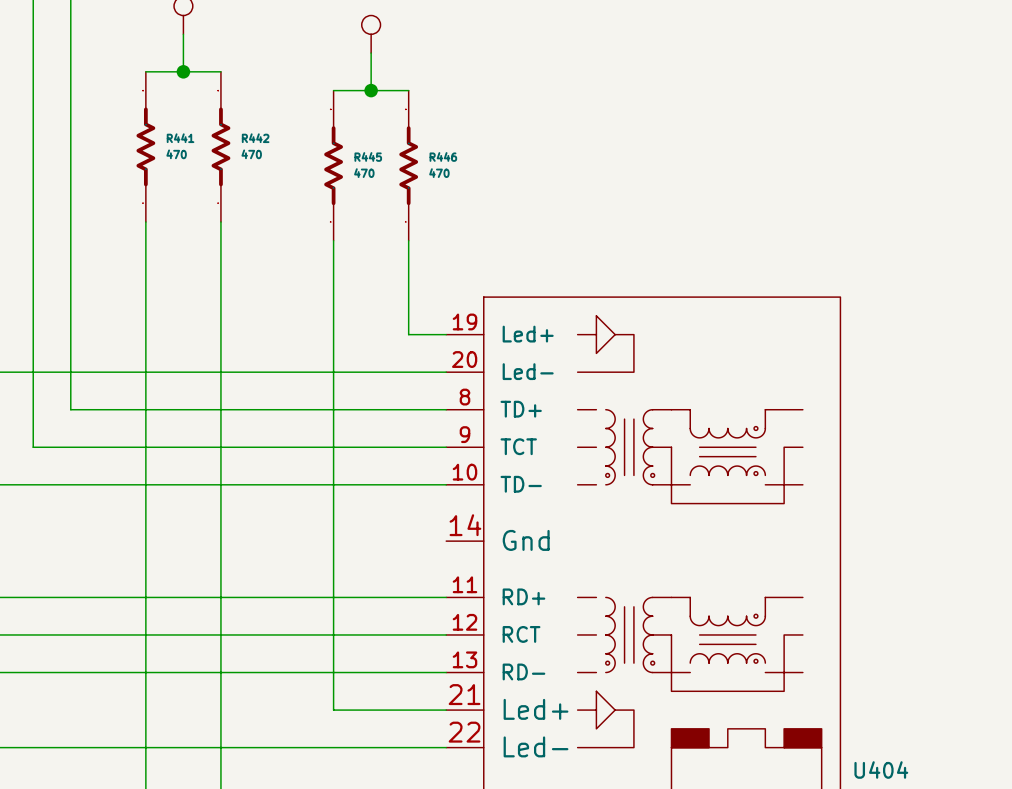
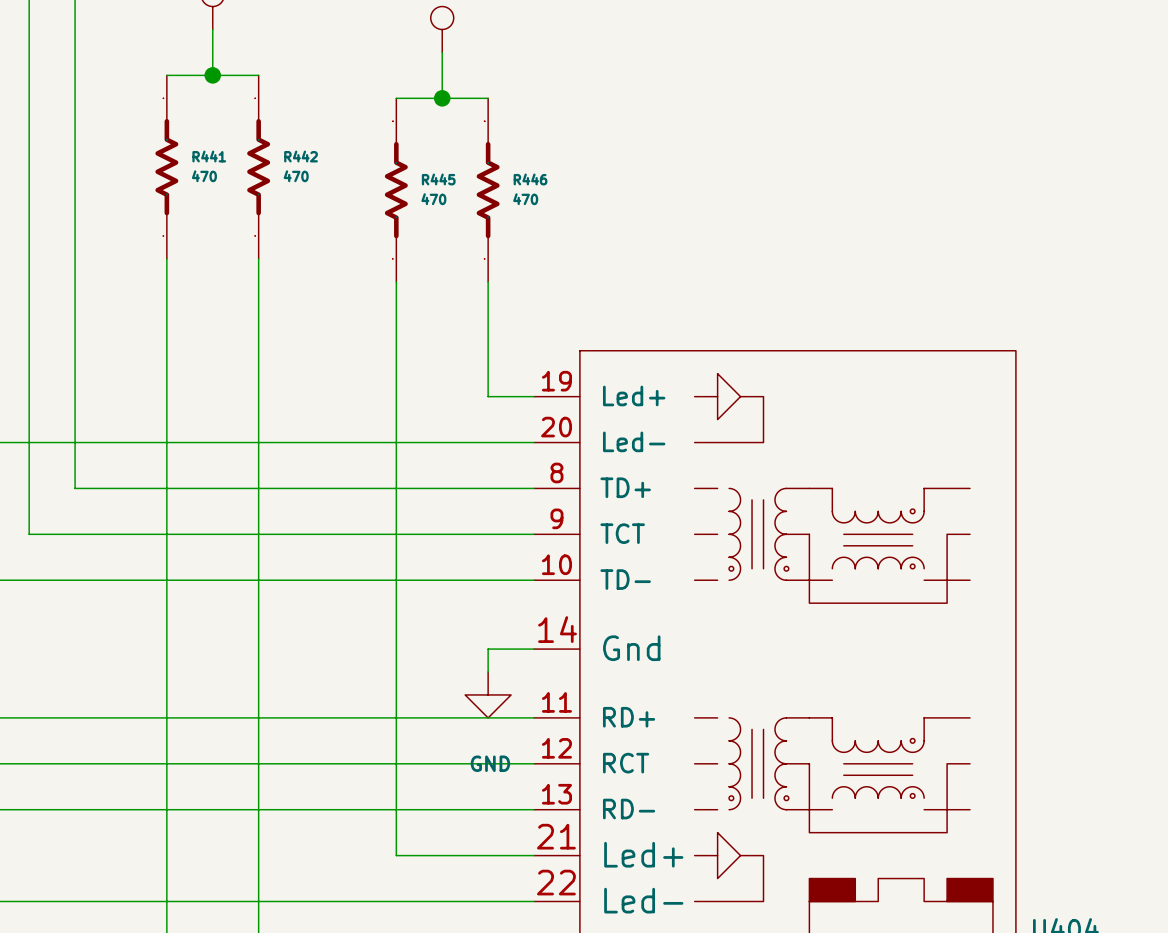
wire: none -> (534, 649) (488, 649) (488, 672)
power symbol: none -> GND (488, 694)

